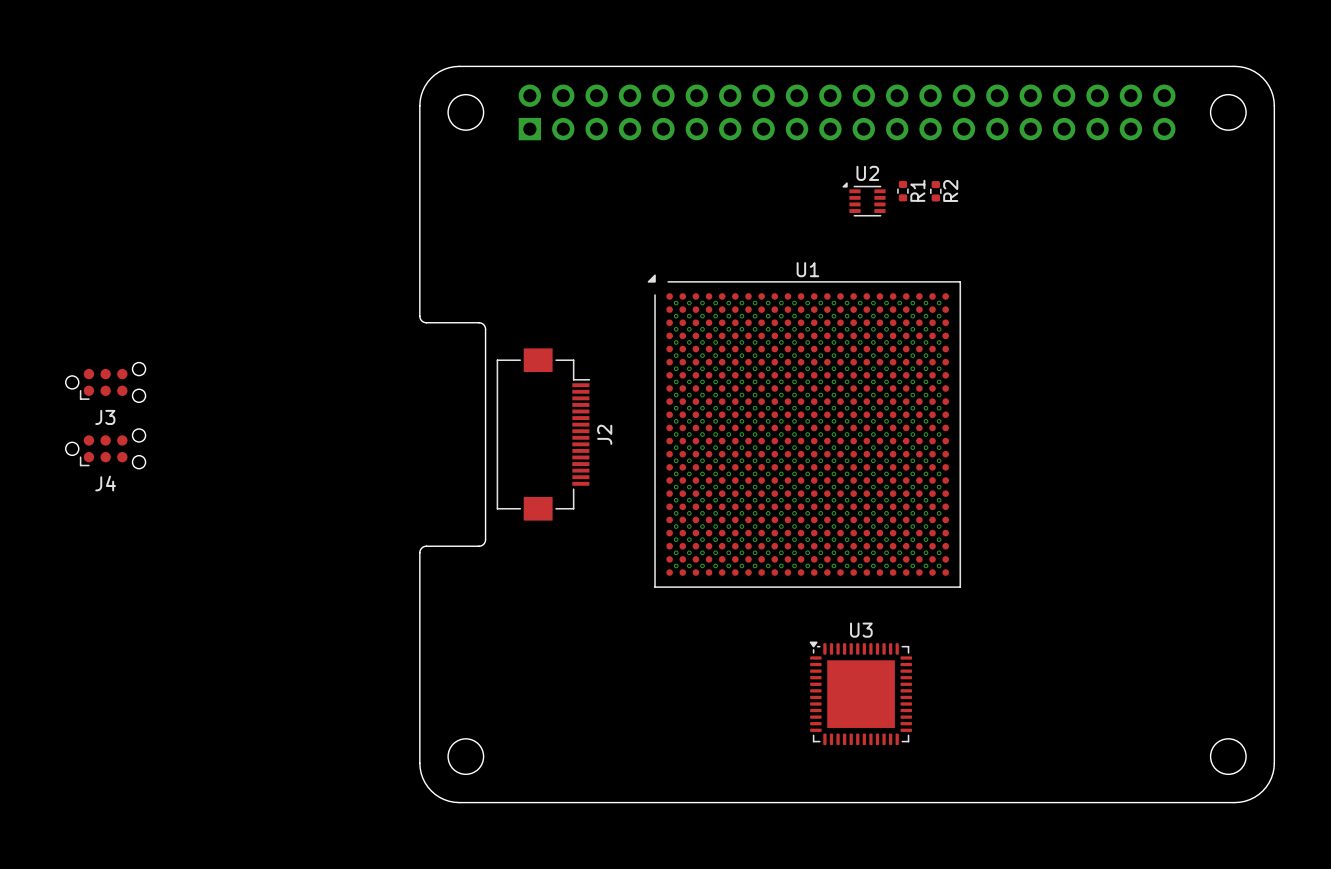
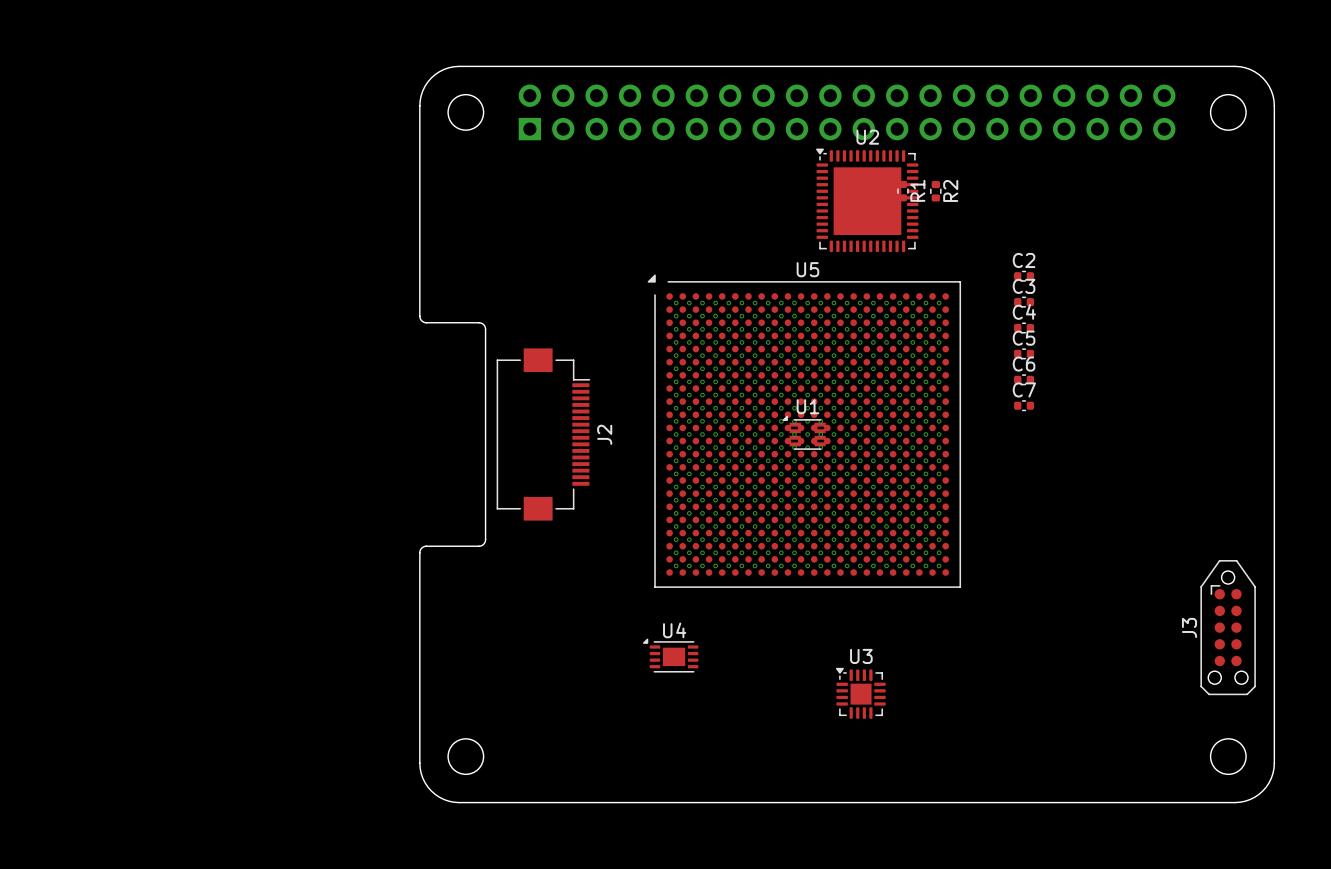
U2 name position: U2 (867, 173) -> U2 (867, 137)
U2 footprint: [842, 182, 886, 217] -> [816, 148, 919, 253]
U1 name: U1 (807, 269) -> U5 (807, 269)
C2: none -> (1024, 276)
C3: none -> (1024, 302)
C4: none -> (1024, 328)
C5: none -> (1024, 353)
J3 footprint: [65, 362, 146, 403] -> [1200, 560, 1256, 696]
C6: none -> (1024, 379)
C7: none -> (1024, 405)
J3 name position: J3 (105, 417) -> J3 (1189, 627)
U1: none -> (804, 432)
J4: (105, 448) -> none
U3 footprint: [809, 641, 913, 746] -> [835, 667, 886, 719]
U4: none -> (670, 655)

